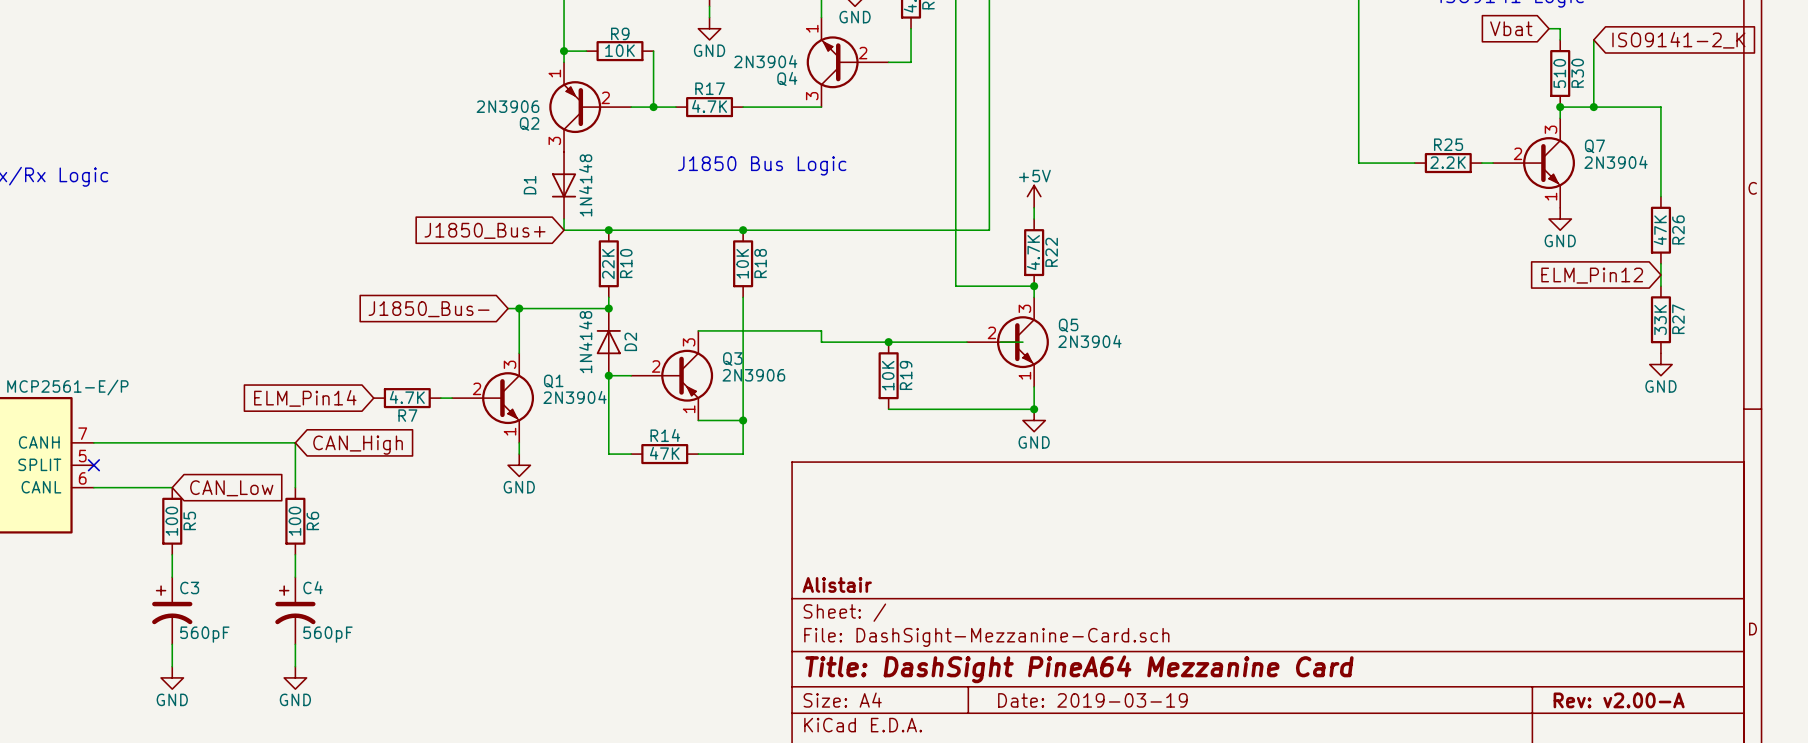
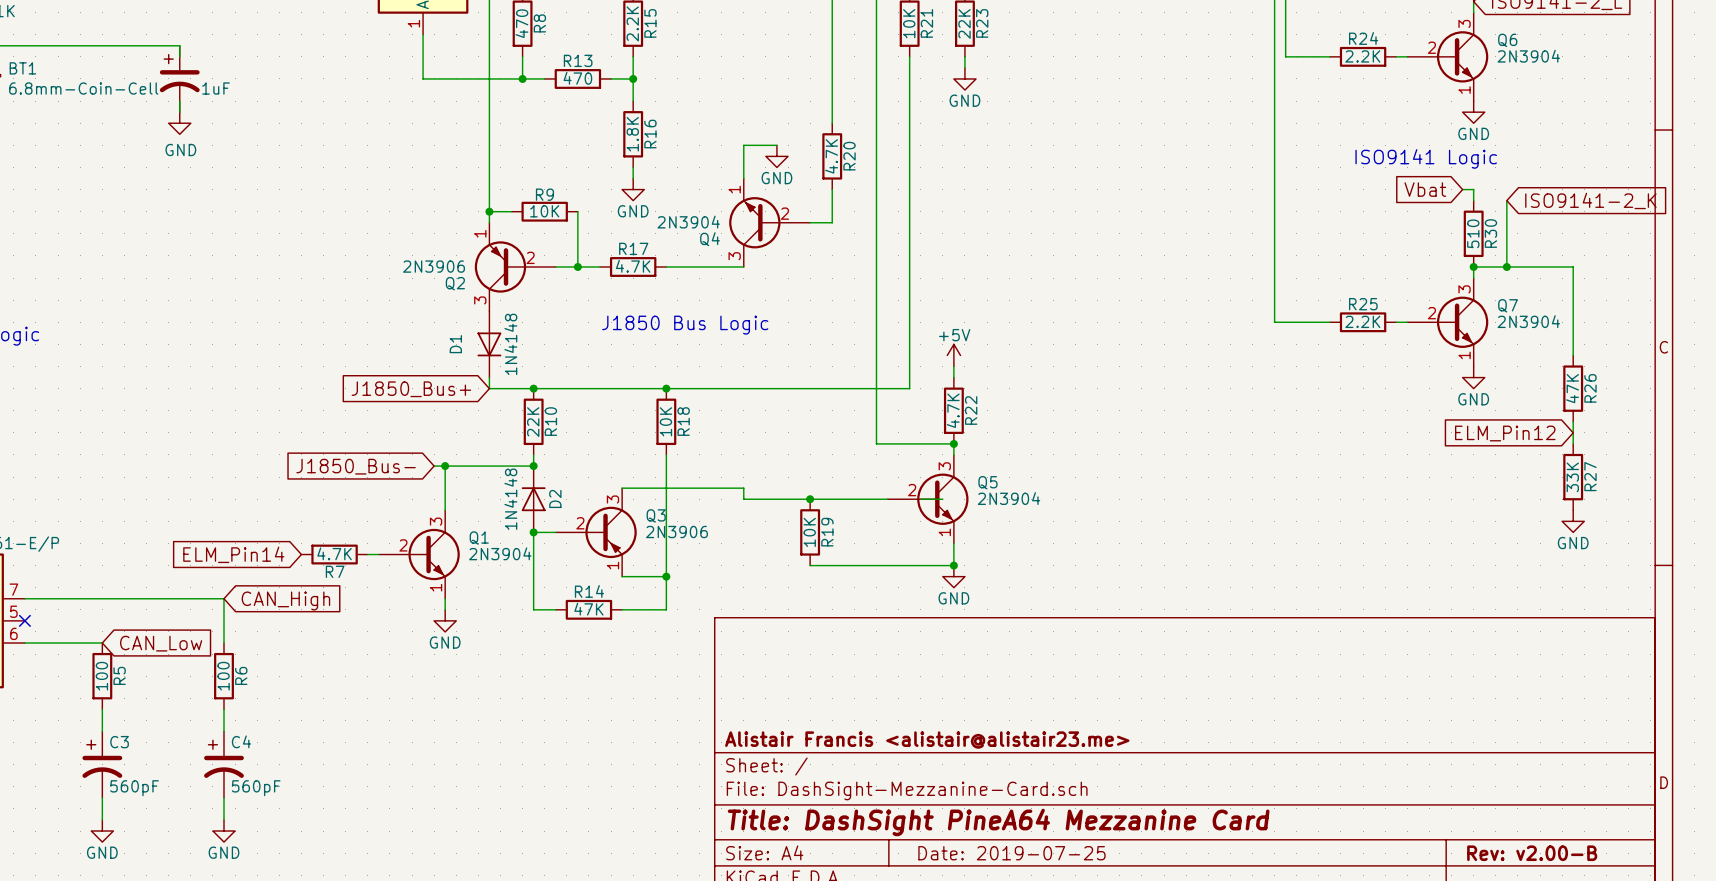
title block: Alistair (837, 584) -> Alistair Francis <alistair@alistair23.me> (927, 740)
title block: Date: 2019-03-19 (1092, 700) -> Date: 2019-07-25 (1011, 853)
title block: Rev: v2.00-A (1619, 700) -> Rev: v2.00-B (1532, 853)

